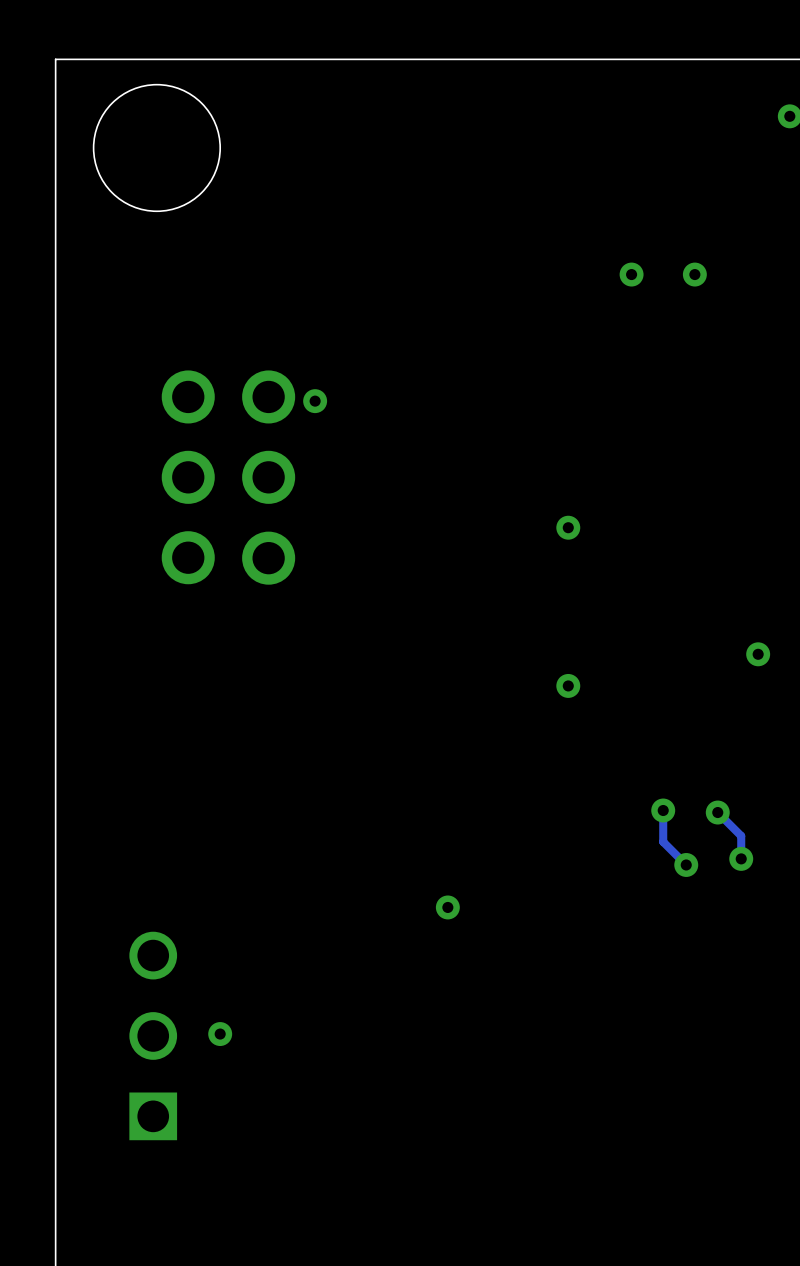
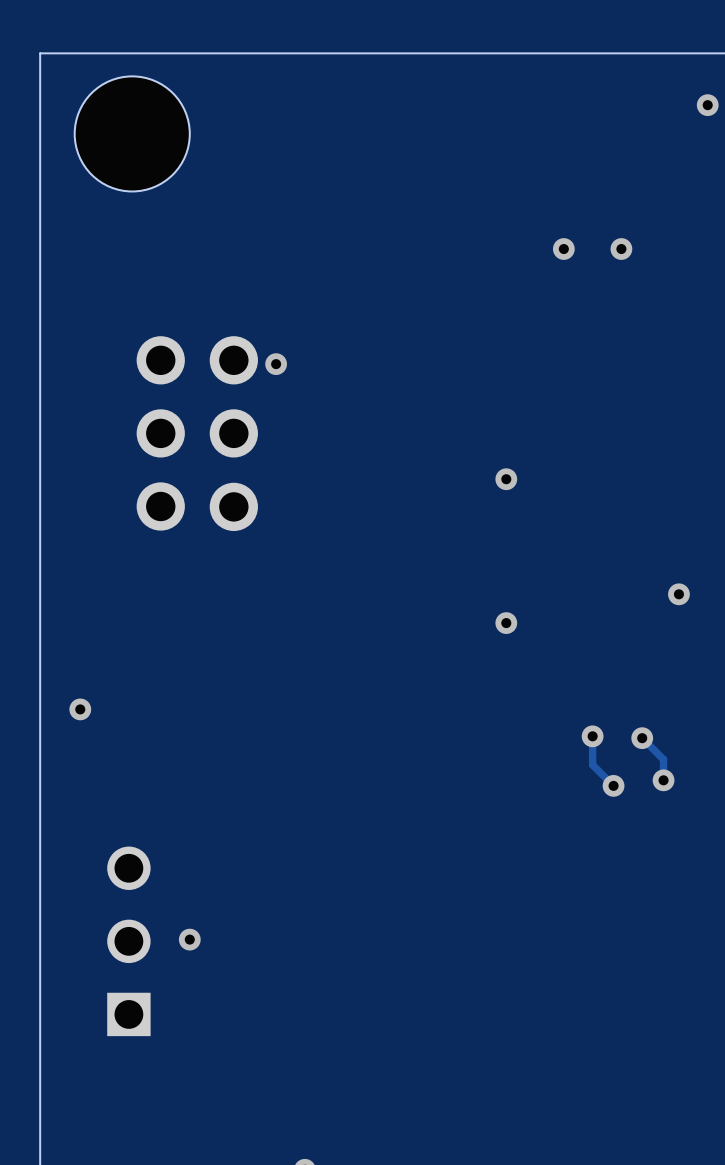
via: none -> (80, 709)
via: (447, 907) -> none

